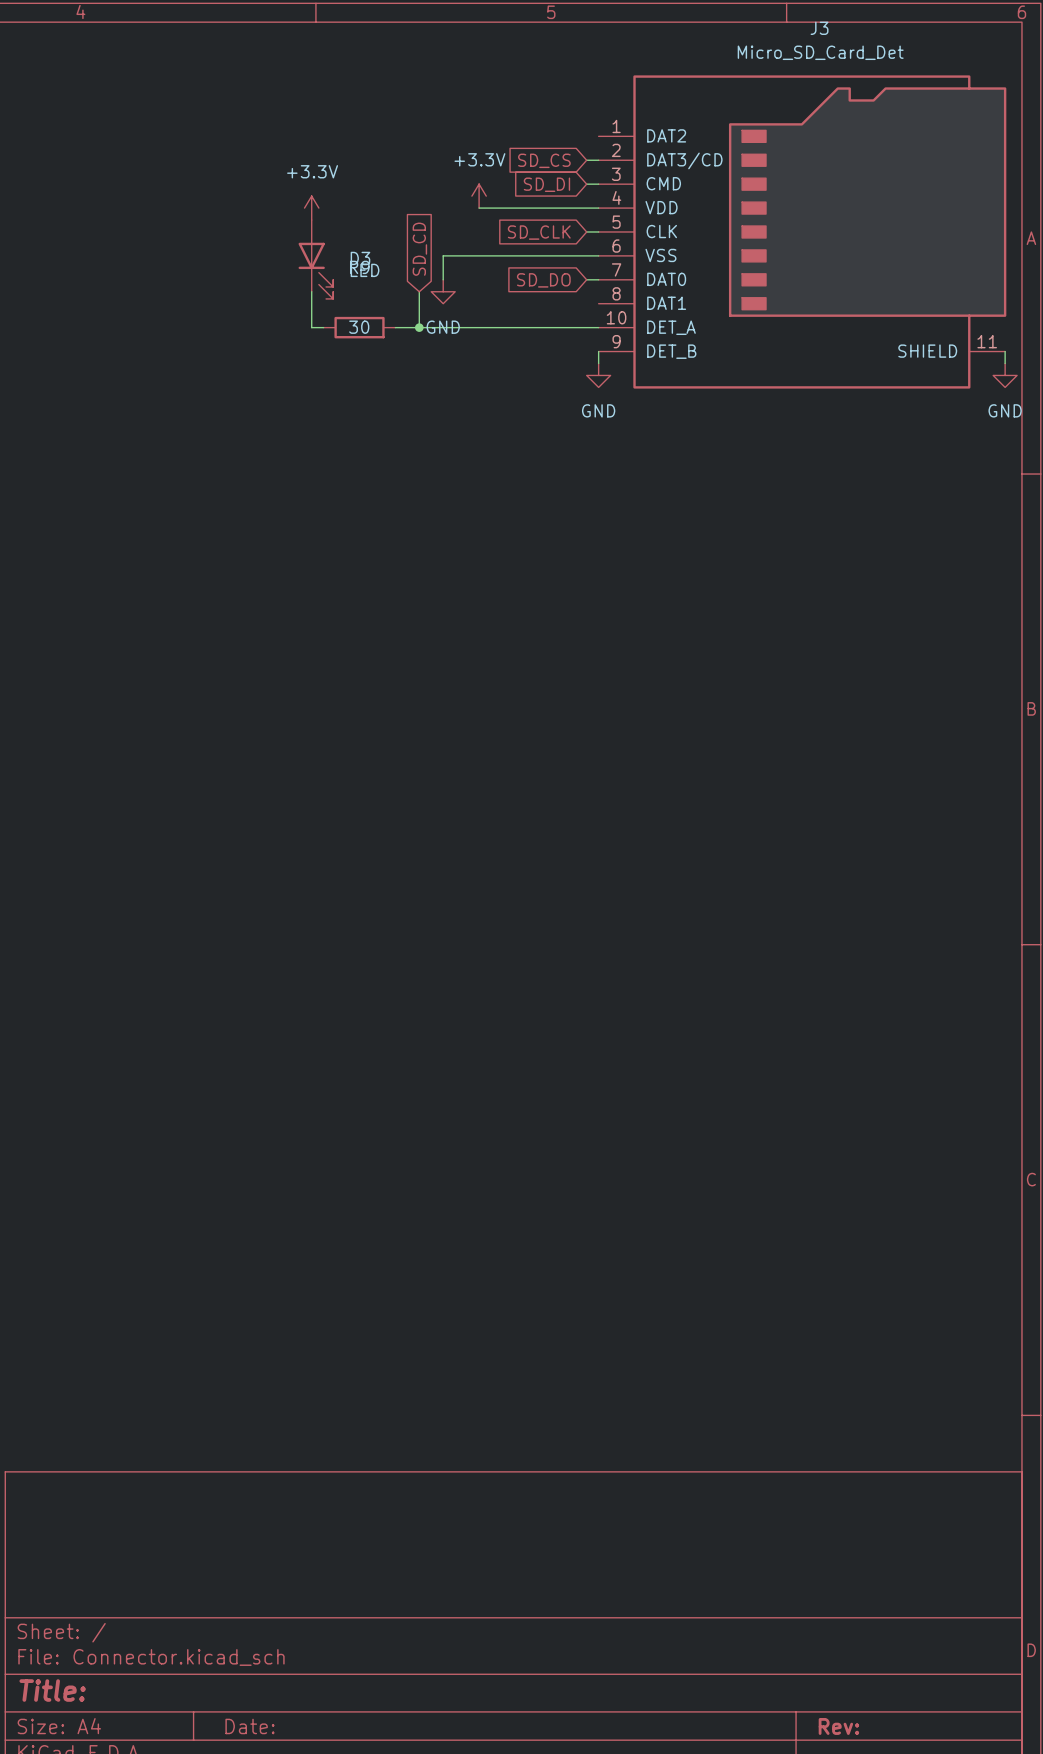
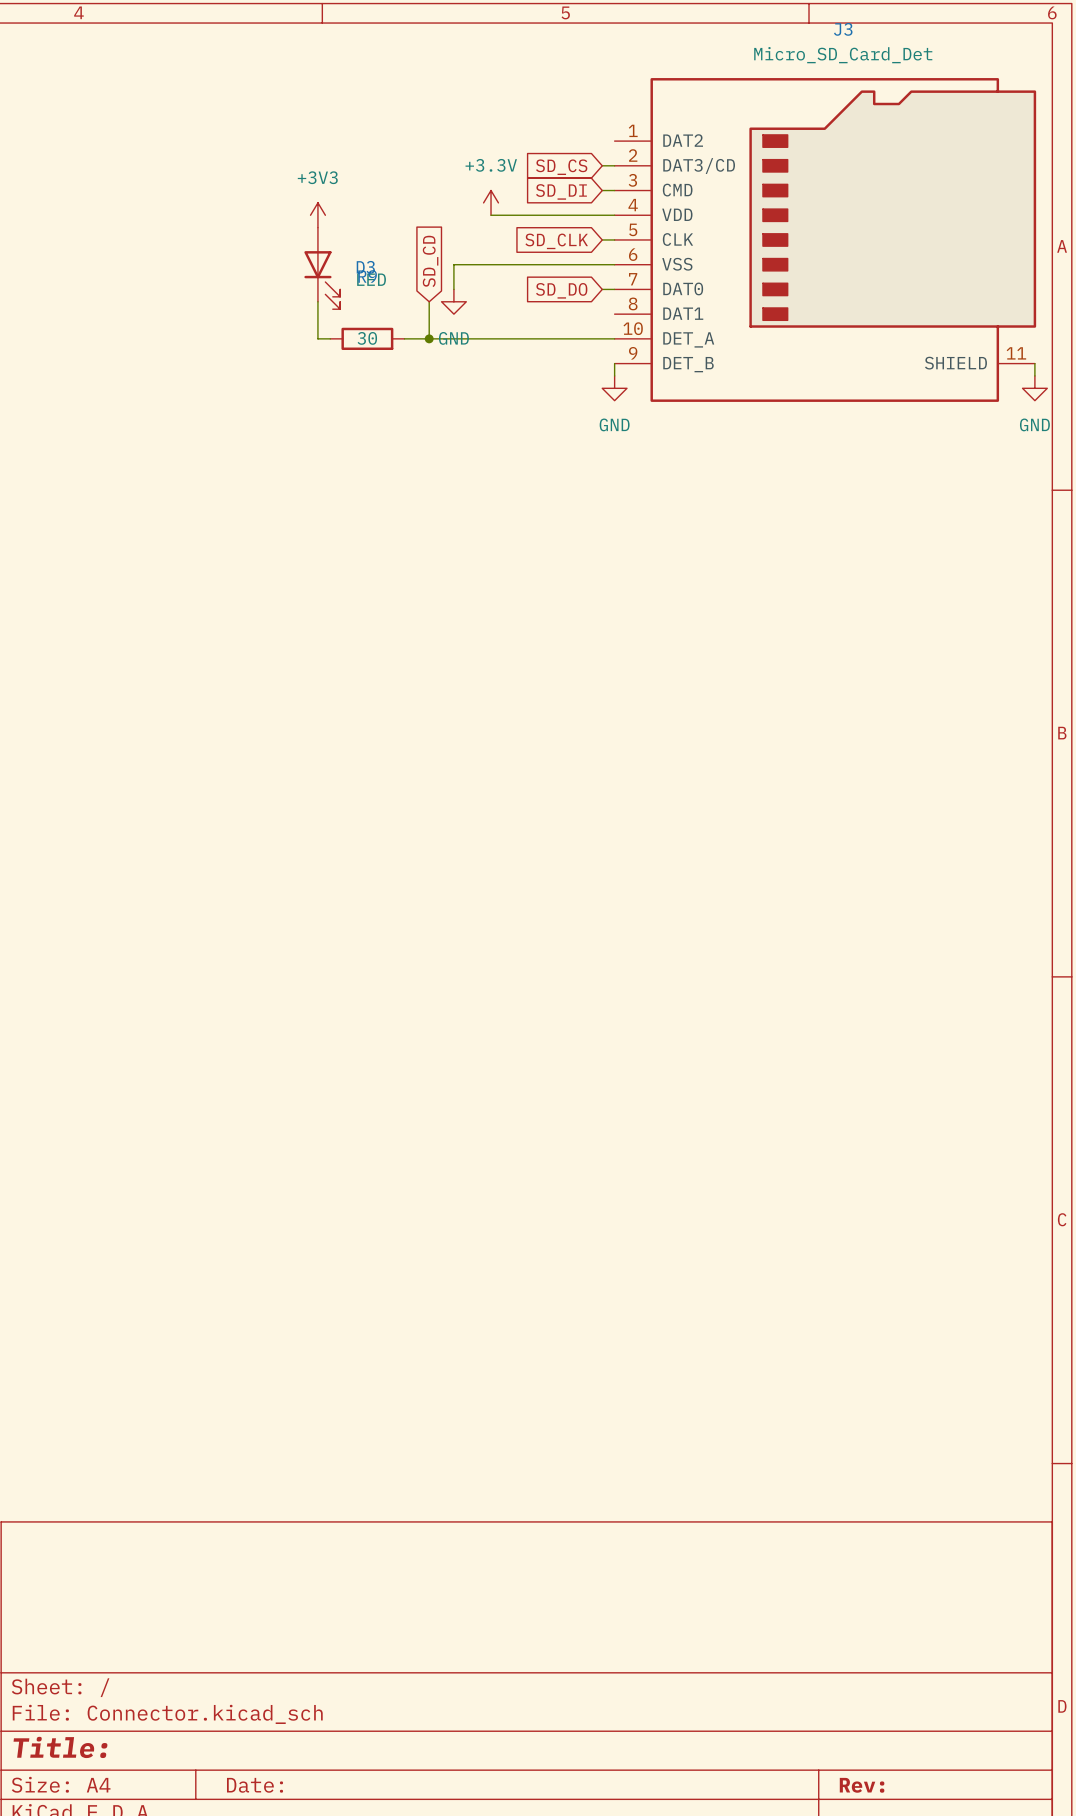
power symbol: +3.3V (311, 208) -> +3V3 (317, 215)

